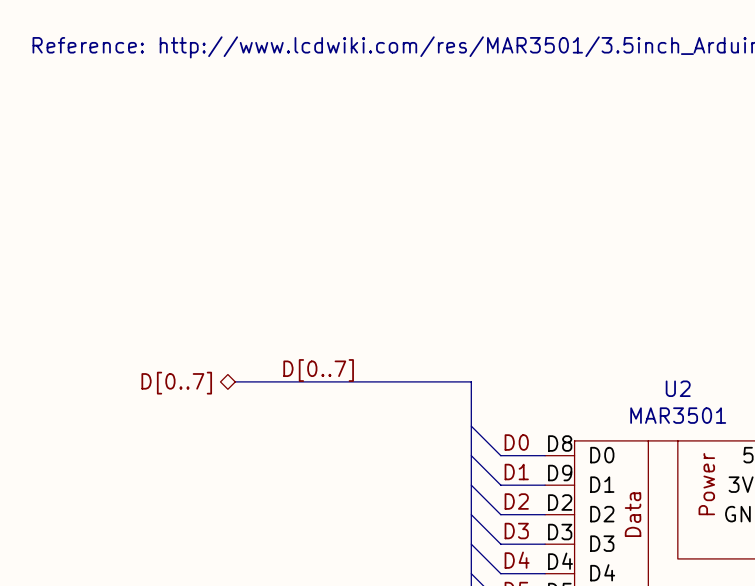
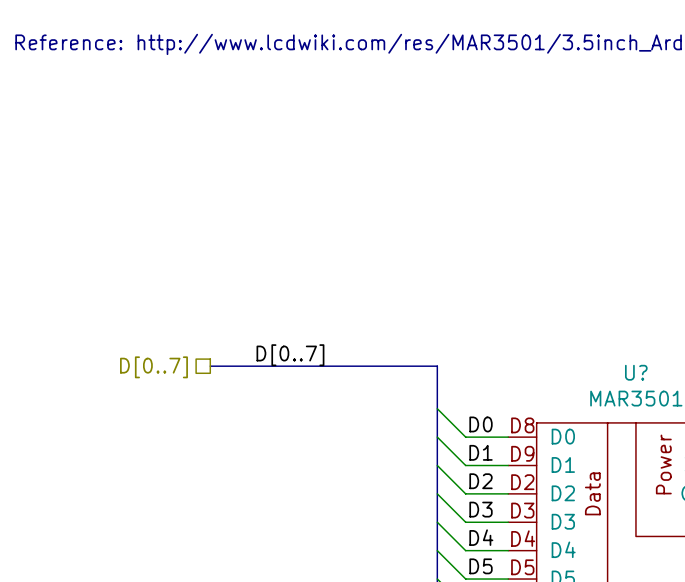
hierarchical label shape: bidirectional (176, 383) -> passive (153, 367)
U2 name: U2 (678, 388) -> U? (636, 372)

